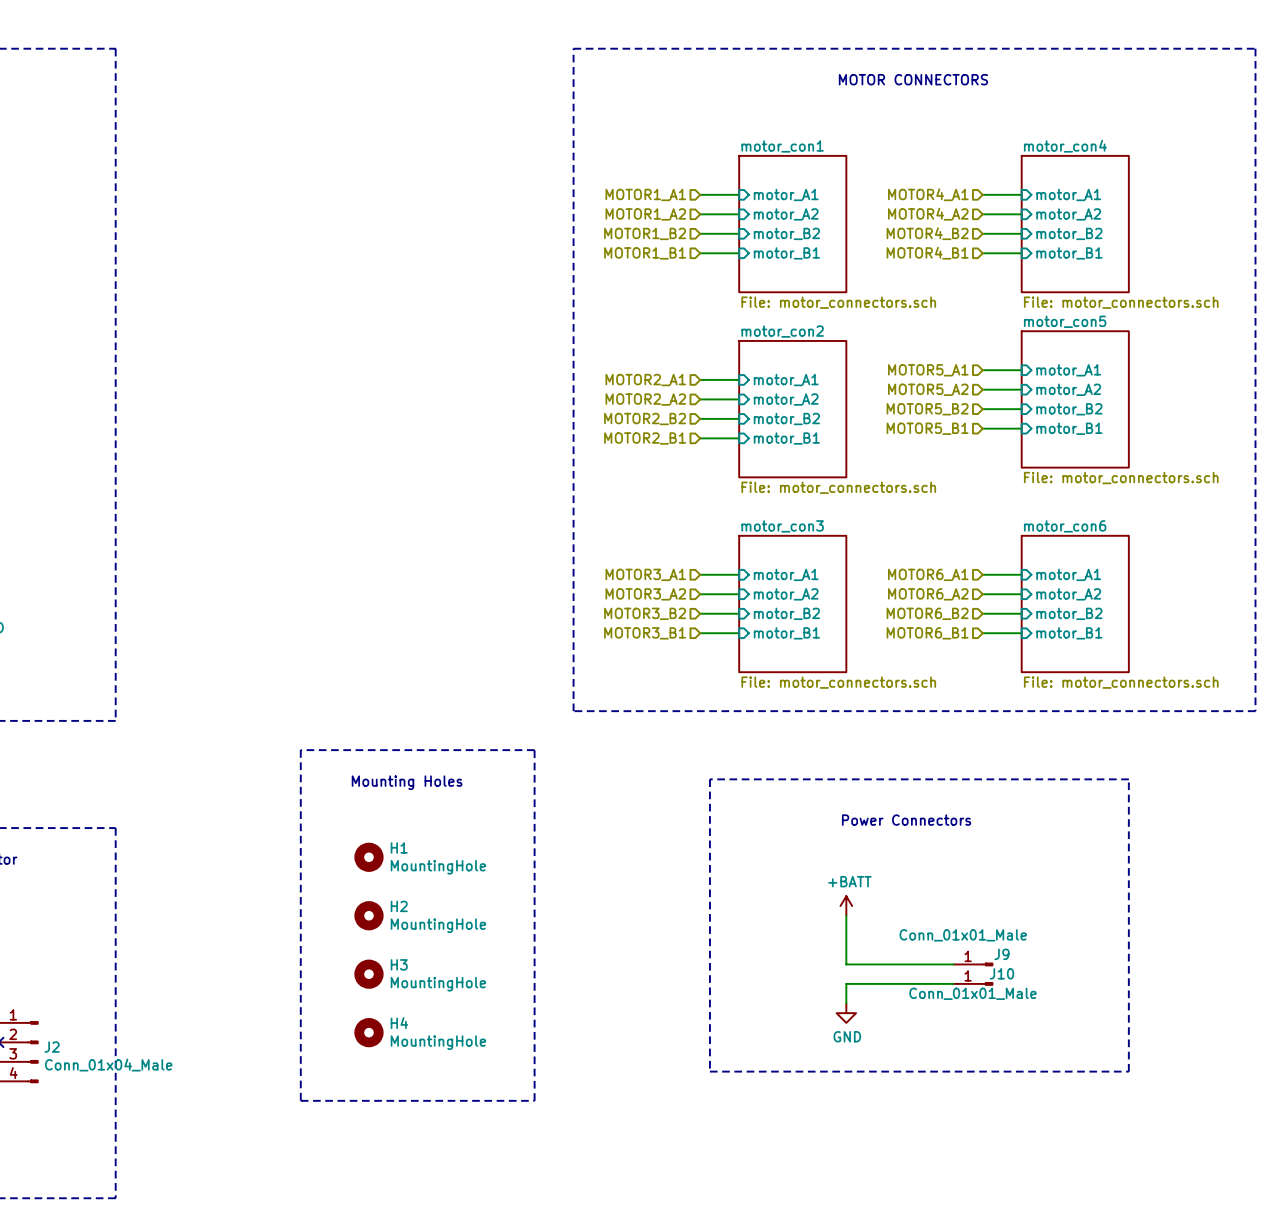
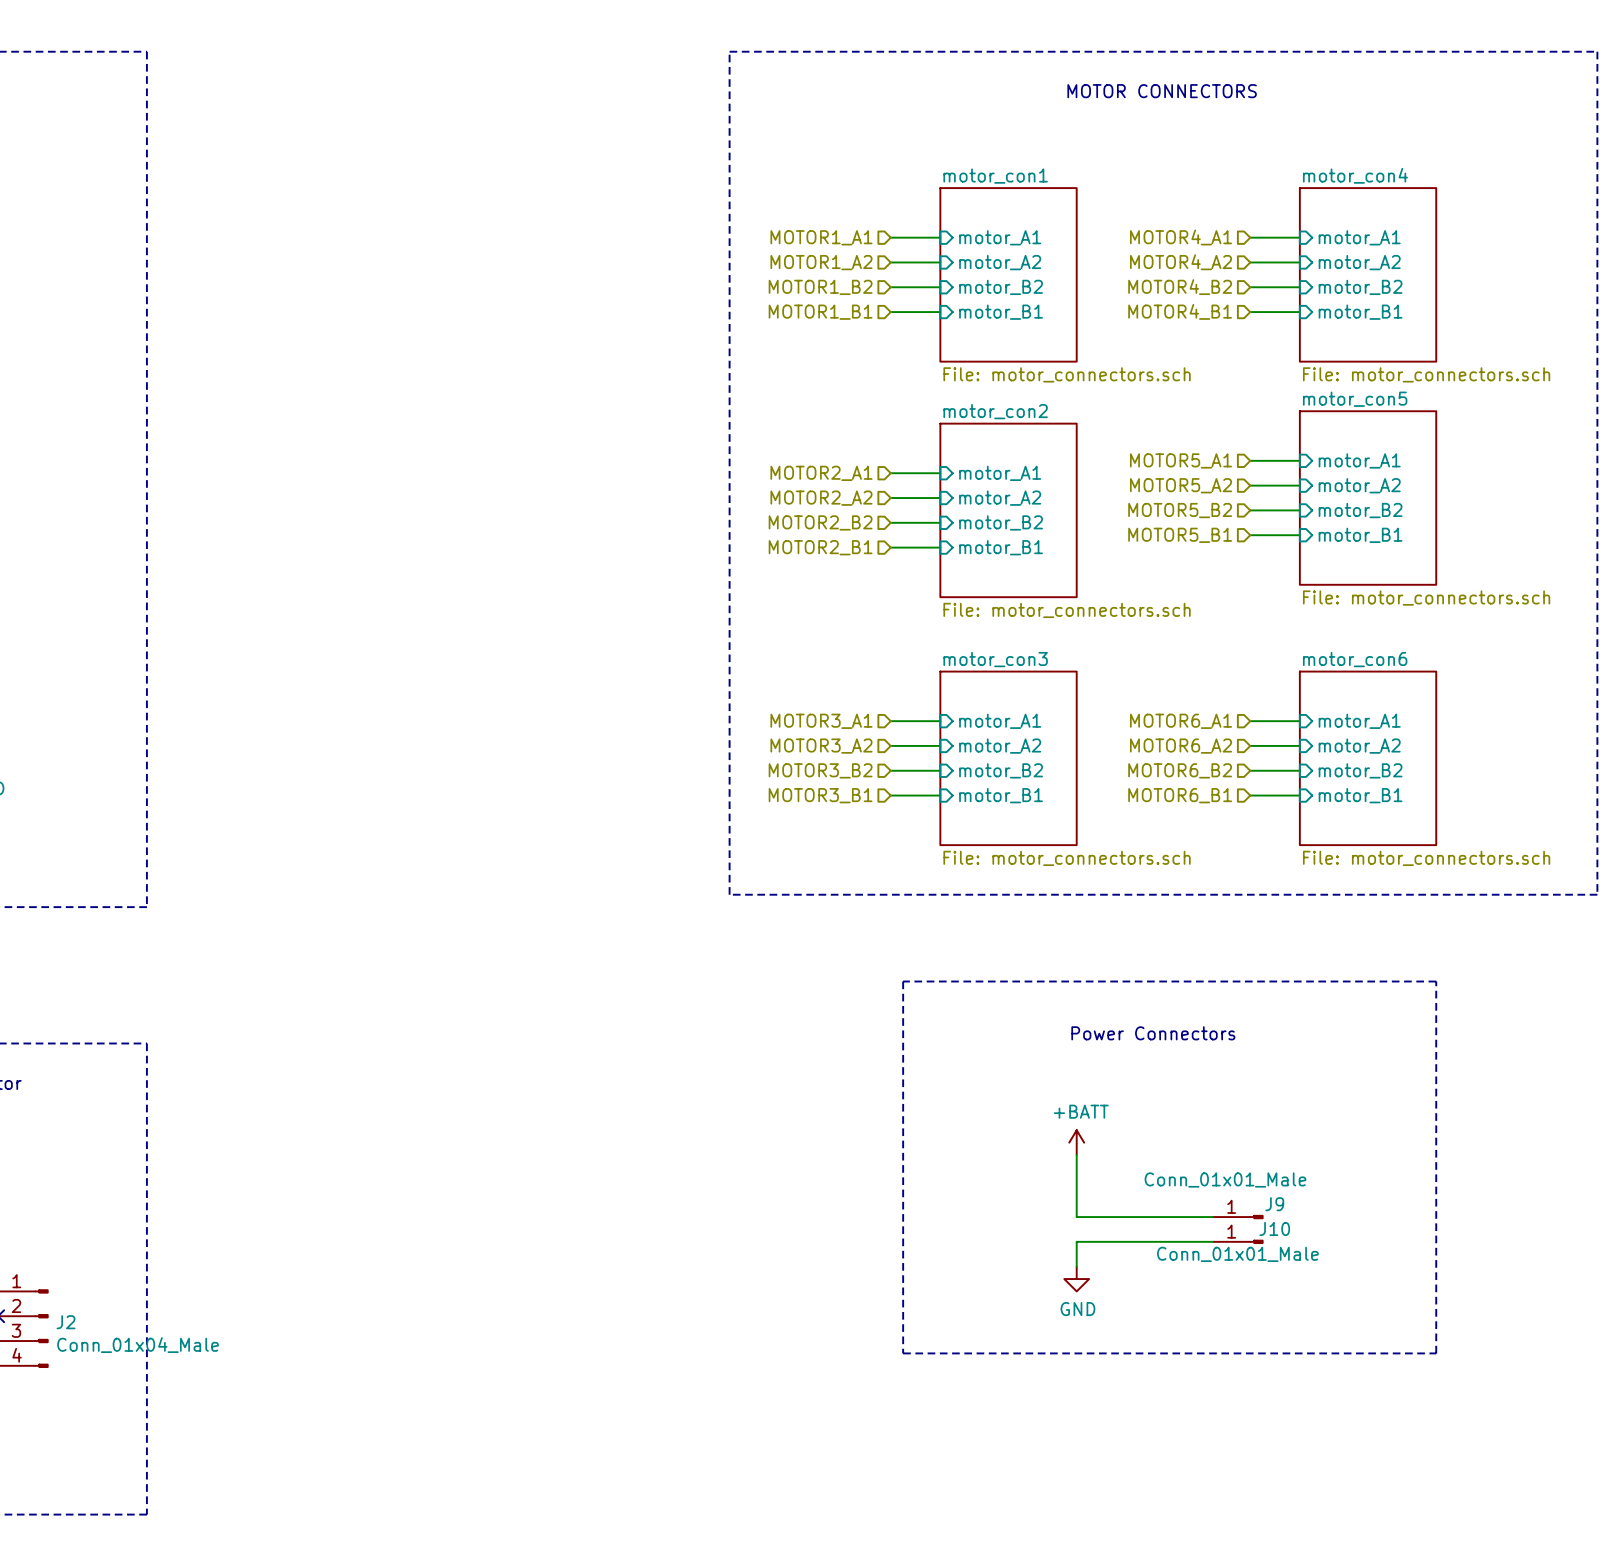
line: (300, 750) (534, 750) (534, 1100) (300, 1100) (300, 750) -> none
text: Mounting Holes (407, 782) -> none
H1: MountingHole (368, 857) -> none
H2: MountingHole (368, 915) -> none
H3: MountingHole (368, 974) -> none
H4: MountingHole (368, 1032) -> none

